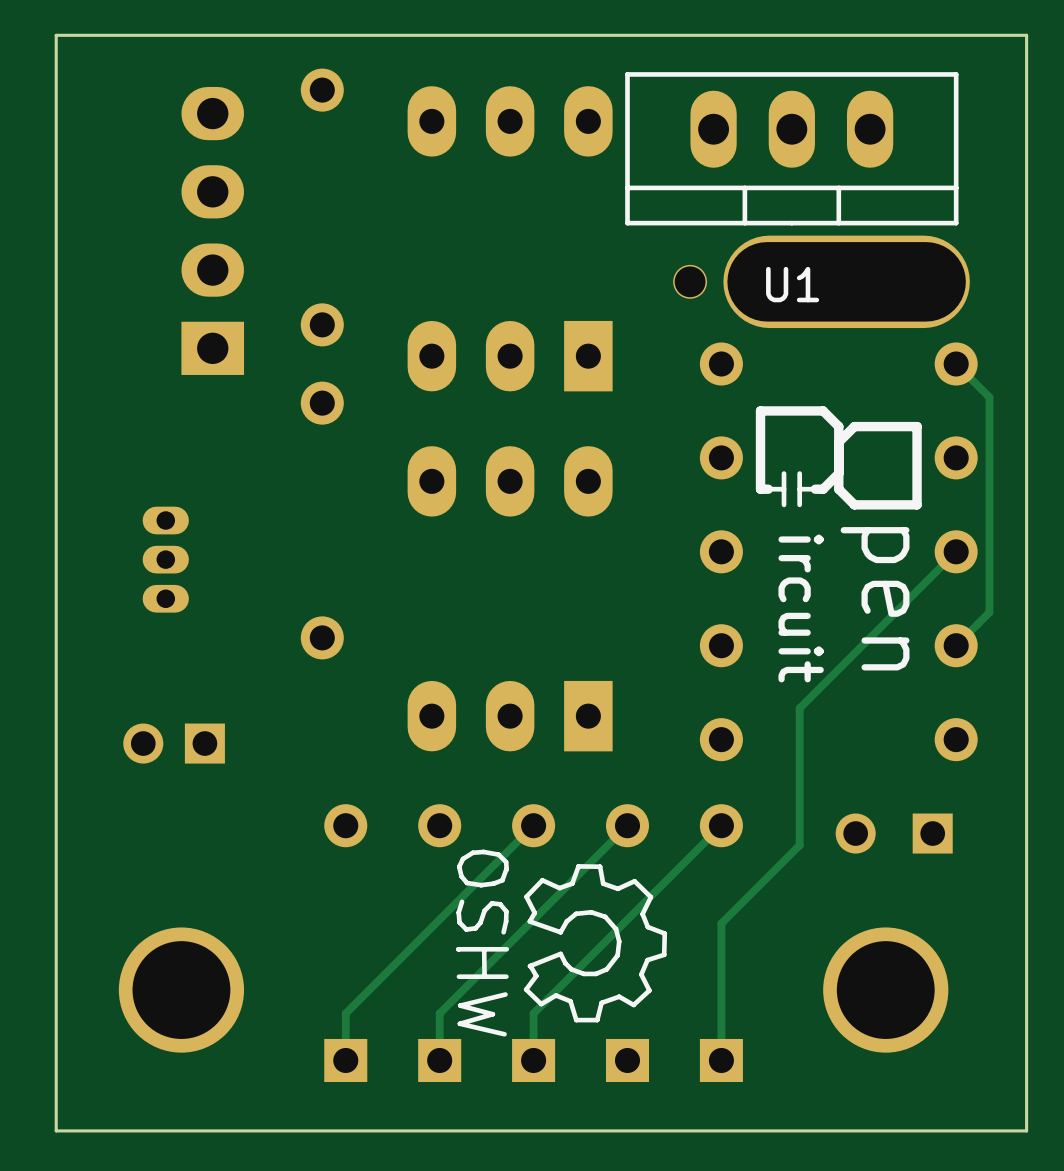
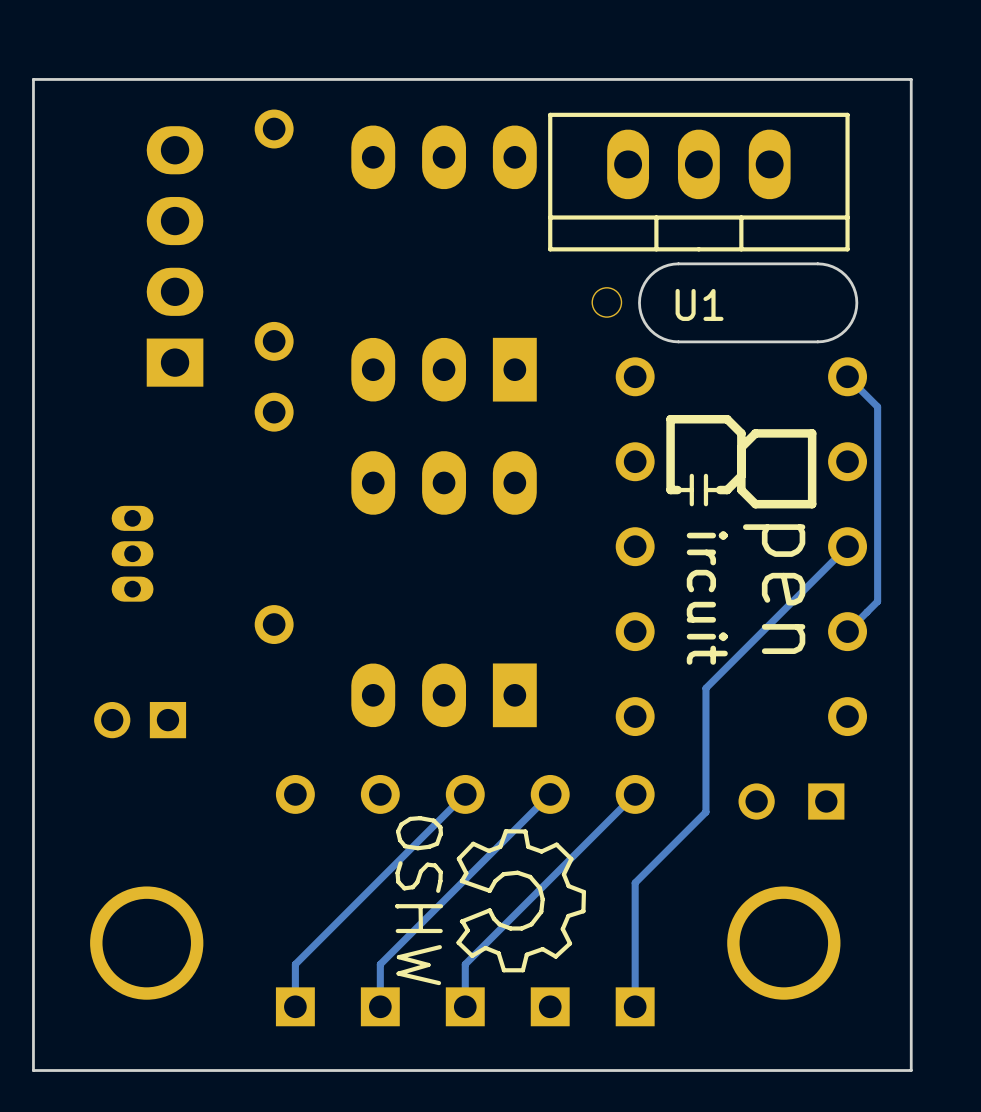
board edge: none -> (817, 263) (668, 265) (654, 271) (644, 283) (639, 297) (640, 312) (644, 322) (654, 333) (673, 341) (827, 340) (837, 336) (848, 326) (855, 312) (856, 297) (851, 283) (841, 271) (827, 265) (817, 263)
part: (846, 281) -> none

